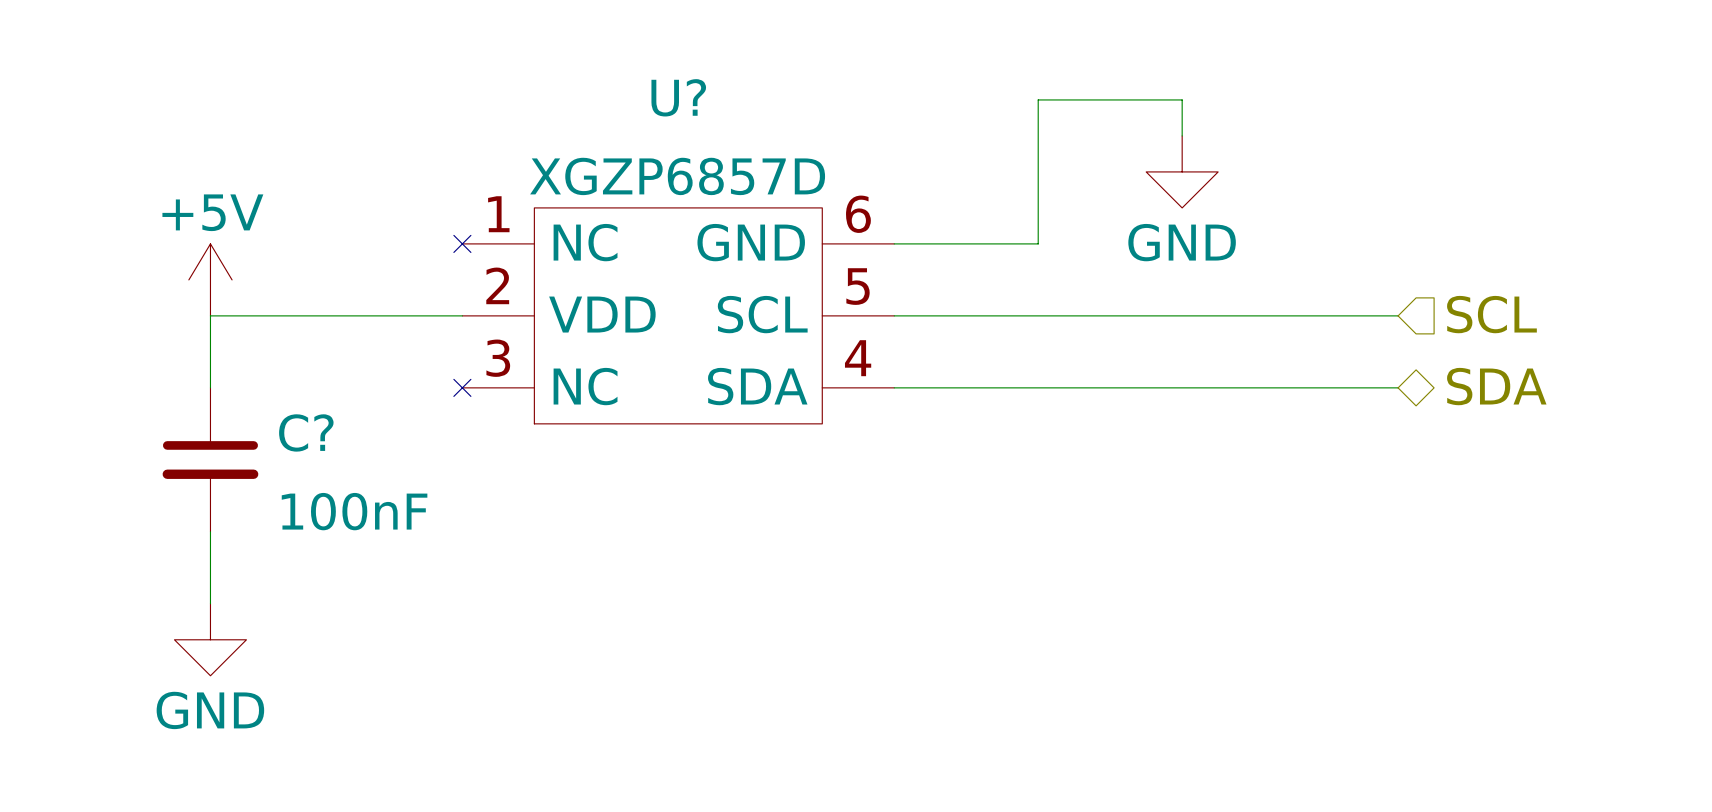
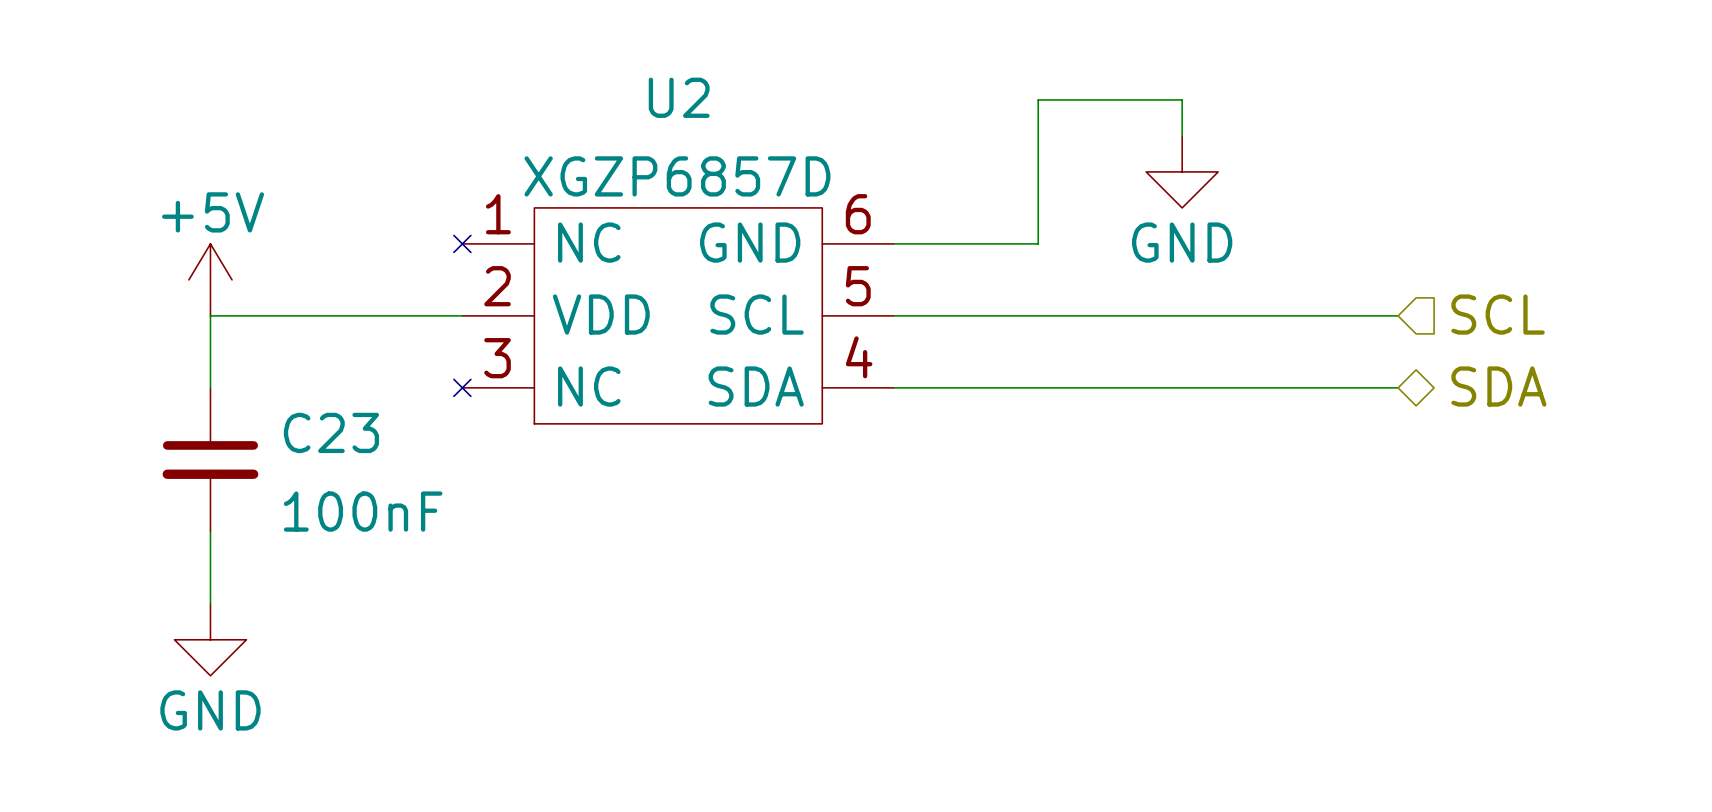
U? name: U? (678, 97) -> U2 (679, 97)
C? name: C? (306, 432) -> C23 (331, 432)

